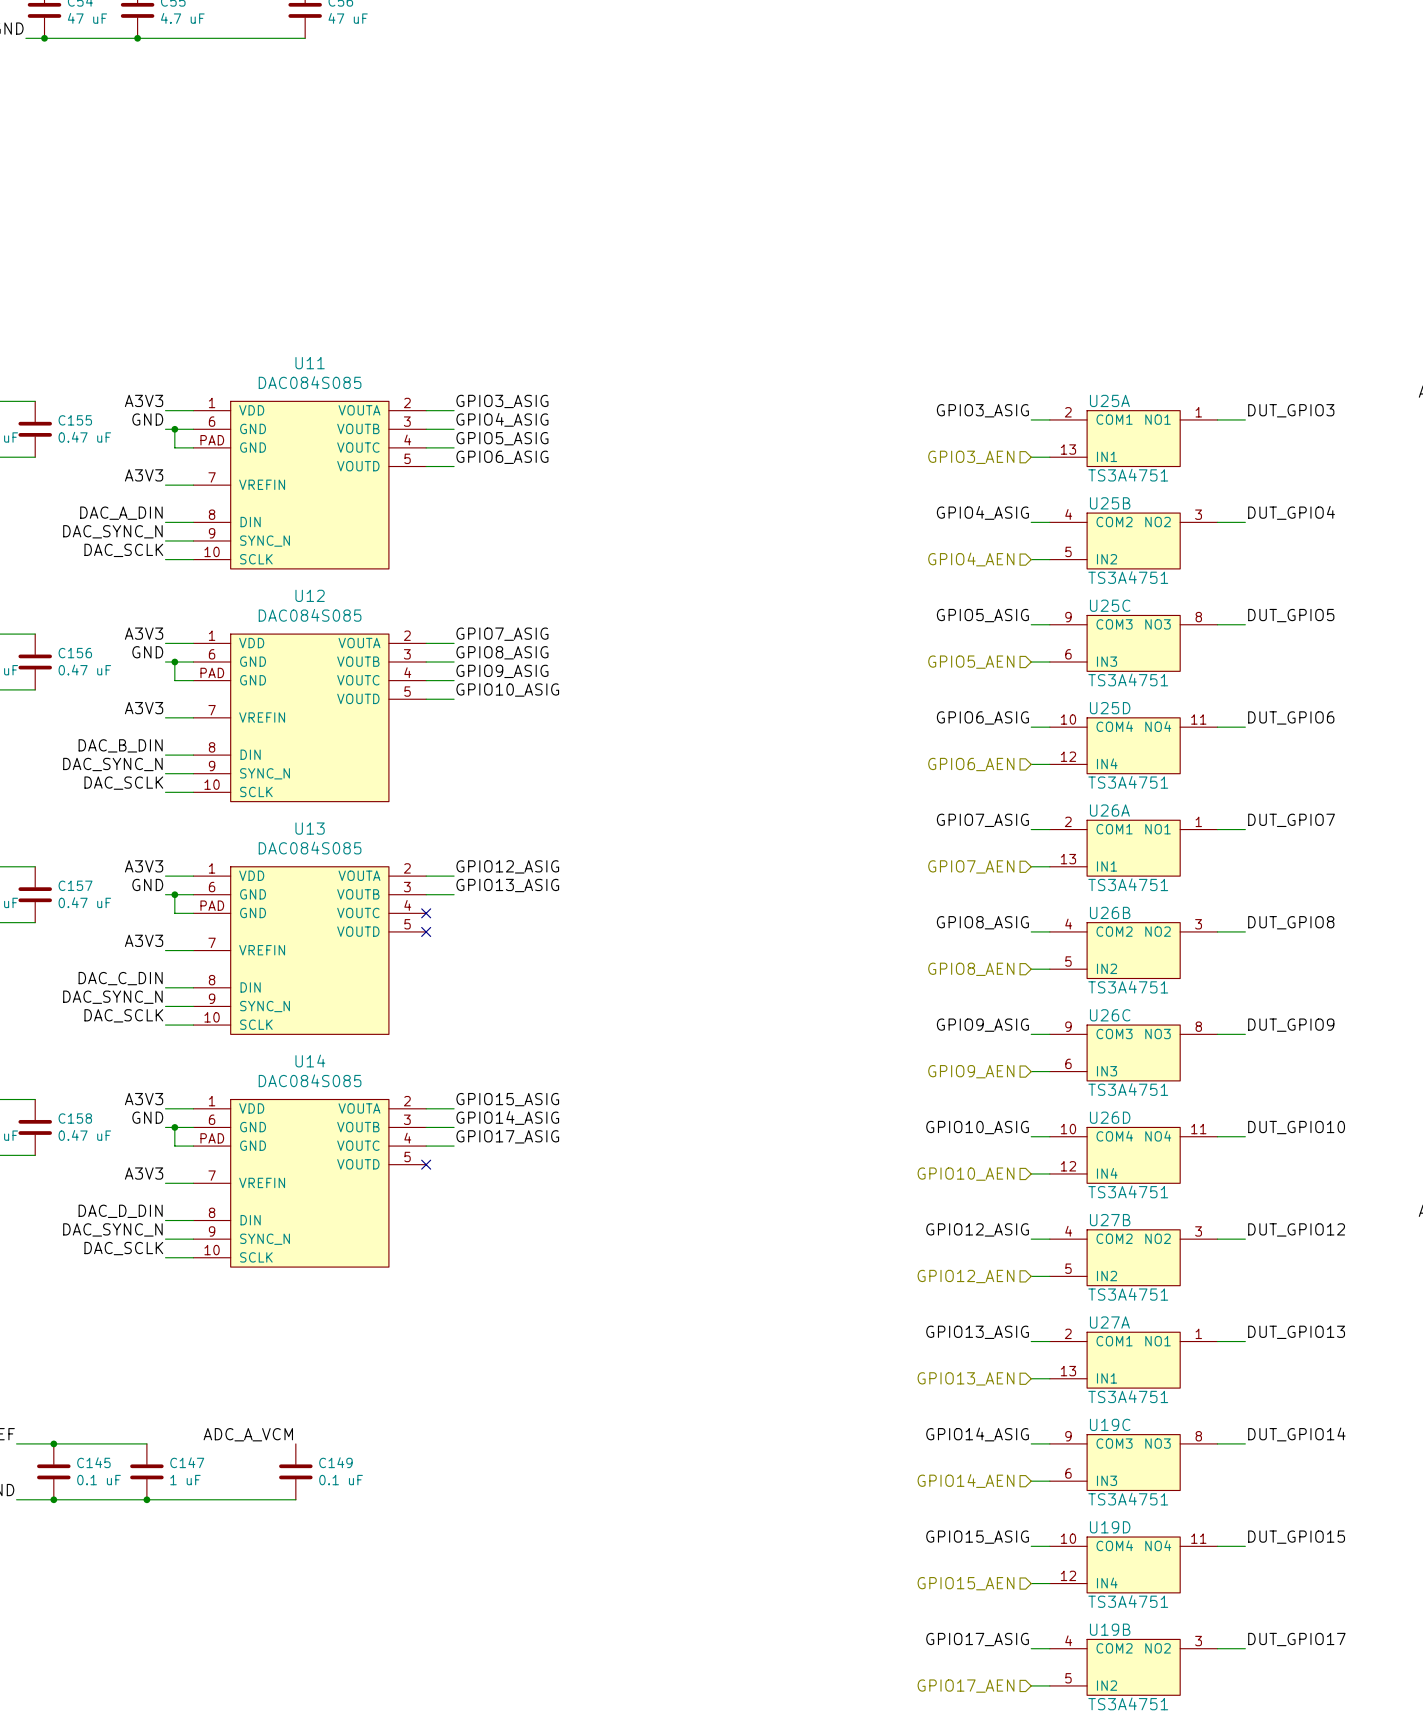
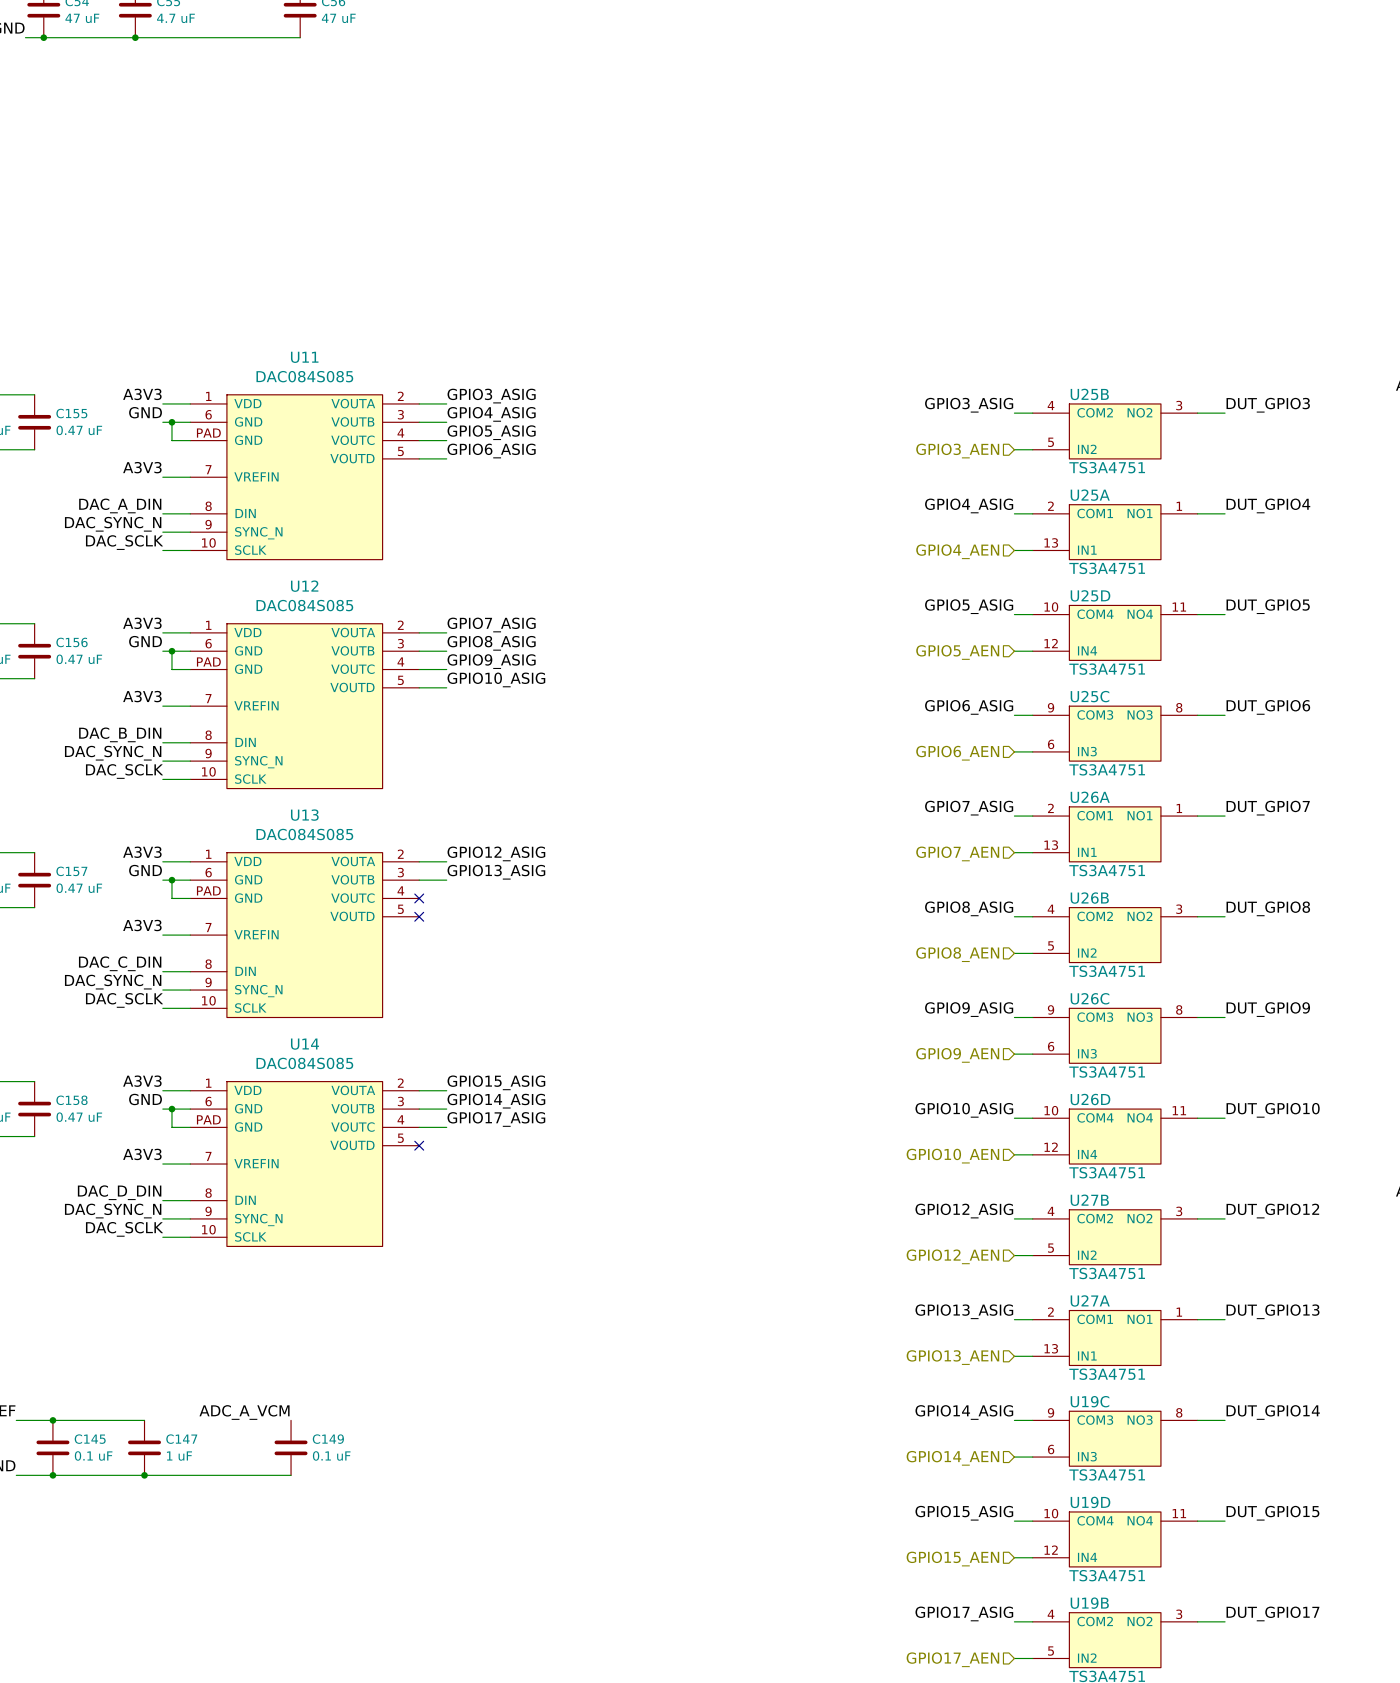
U25A position: (1133, 438) -> (1115, 532)
U25B position: (1133, 540) -> (1115, 431)
U25C position: (1133, 643) -> (1115, 733)
U25D position: (1133, 745) -> (1115, 632)

